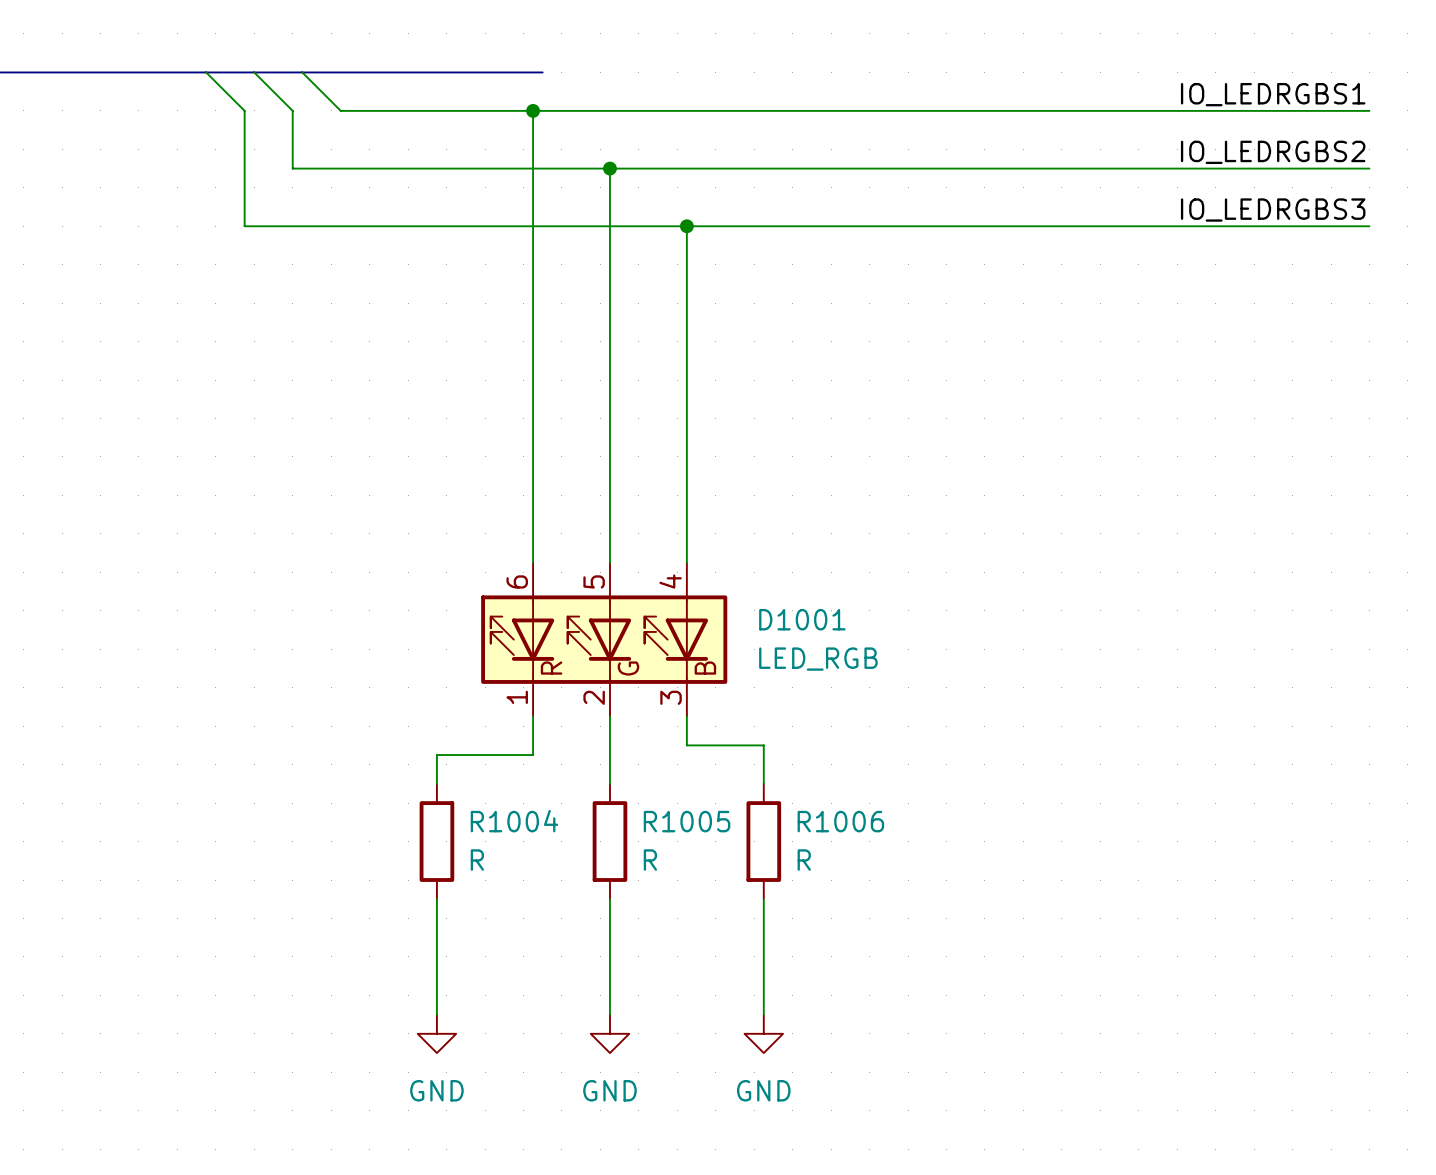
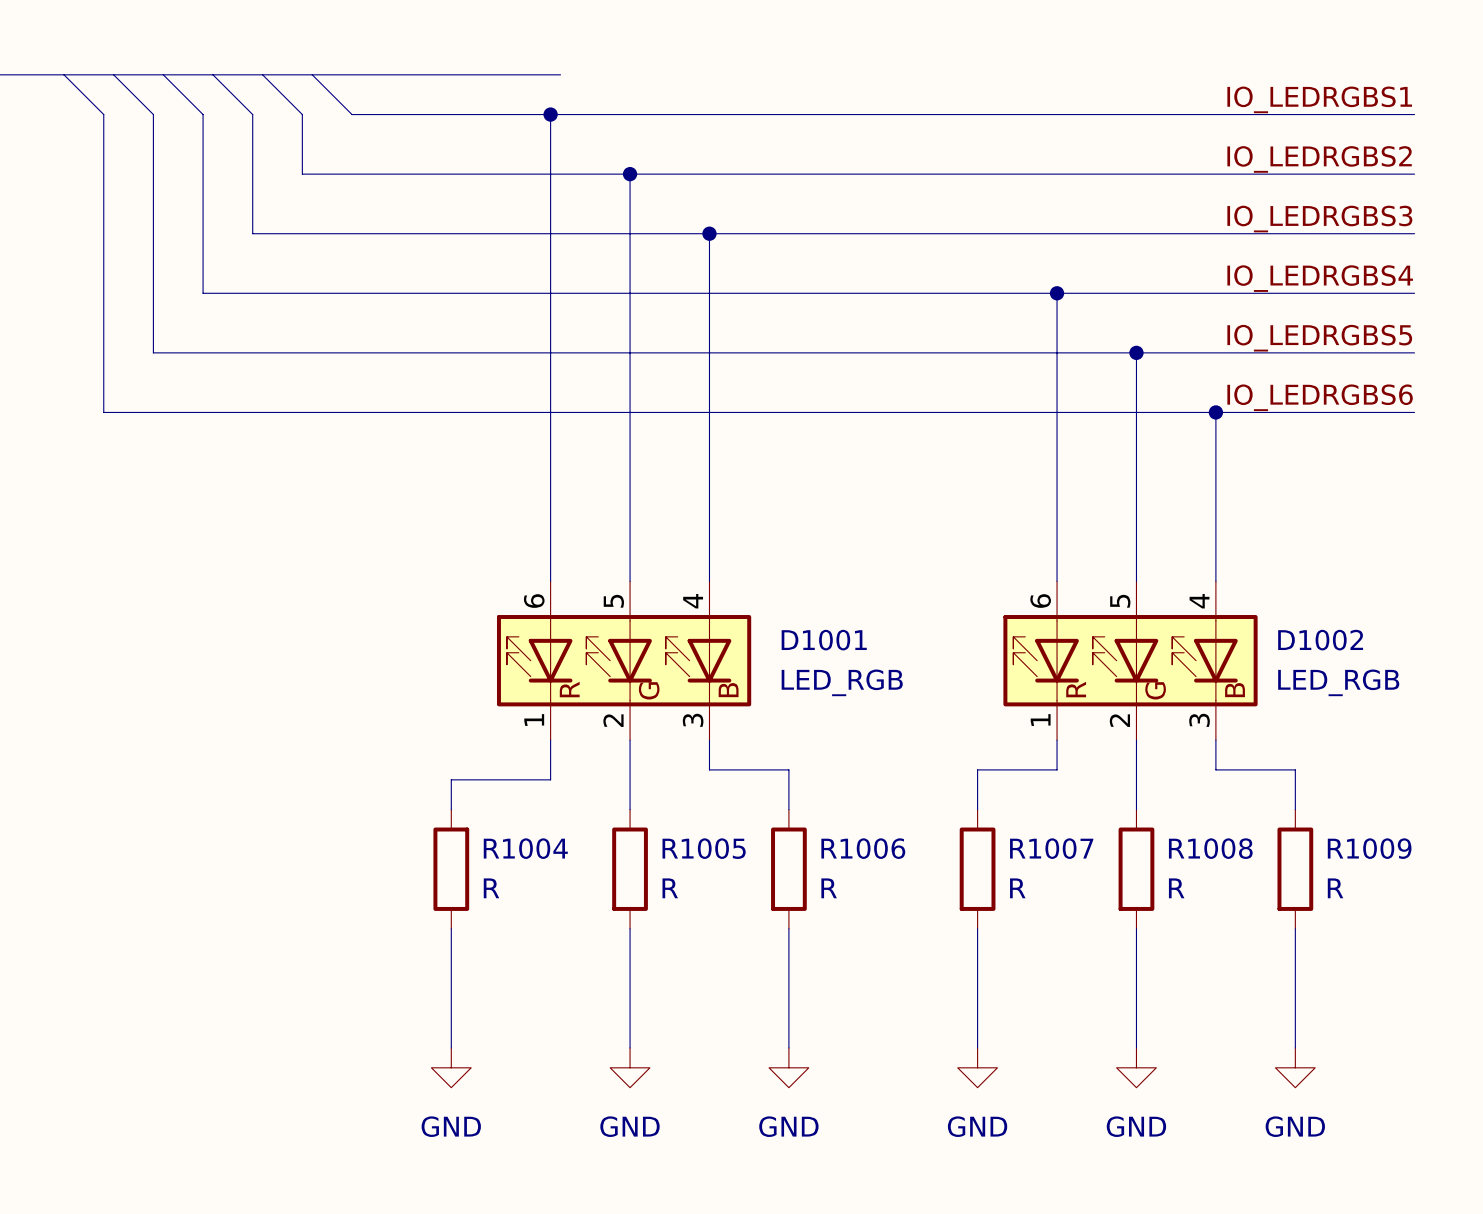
wire: none -> (64, 74) (103, 114) (103, 412) (1414, 412)
wire: none -> (113, 74) (153, 114)
wire: none -> (163, 74) (203, 114) (203, 293) (1414, 293)
wire: none -> (153, 114) (153, 352) (1414, 352)
label: none -> IO_LEDRGBS4 (1320, 278)
wire: none -> (1057, 293) (1057, 581)
junction: none -> (1057, 293)
label: none -> IO_LEDRGBS5 (1319, 338)
wire: none -> (1136, 352) (1136, 581)
junction: none -> (1136, 352)
label: none -> IO_LEDRGBS6 (1320, 397)
wire: none -> (1215, 412) (1215, 581)
junction: none -> (1215, 412)
D1002: none -> LED_RGB (1130, 660)
wire: none -> (1057, 740) (1057, 769) (977, 769) (977, 809)
wire: none -> (1136, 740) (1136, 809)
wire: none -> (1215, 740) (1215, 769) (1295, 769) (1295, 809)
R1007: none -> R (977, 869)
R1008: none -> R (1136, 869)
R1009: none -> R (1295, 869)
wire: none -> (977, 928) (977, 1047)
wire: none -> (1136, 928) (1136, 1047)
wire: none -> (1295, 928) (1295, 1047)
power symbol: none -> GND (977, 1067)
power symbol: none -> GND (1136, 1067)
power symbol: none -> GND (1295, 1067)

